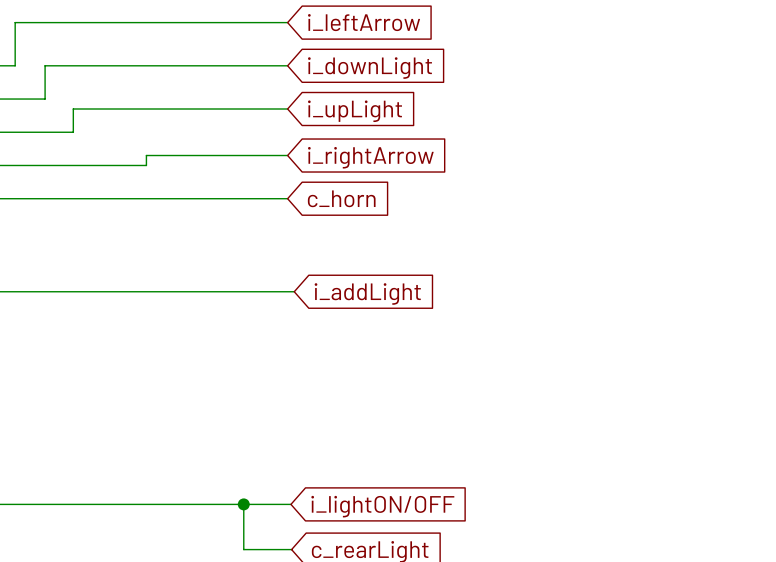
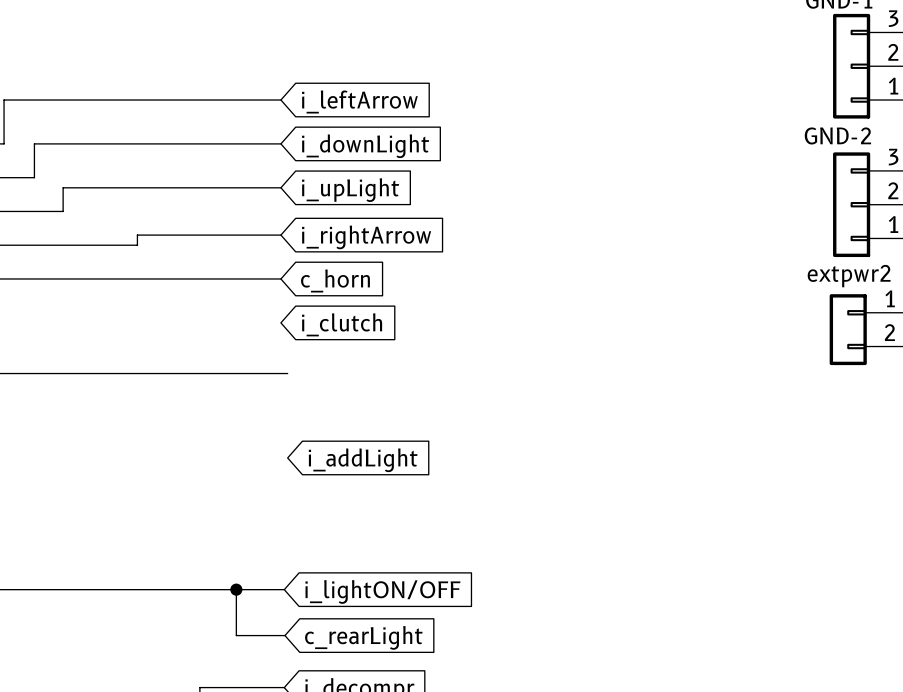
global label: none -> i_clutch (342, 324)
global label position: i_addLight (367, 293) -> i_addLight (363, 460)

